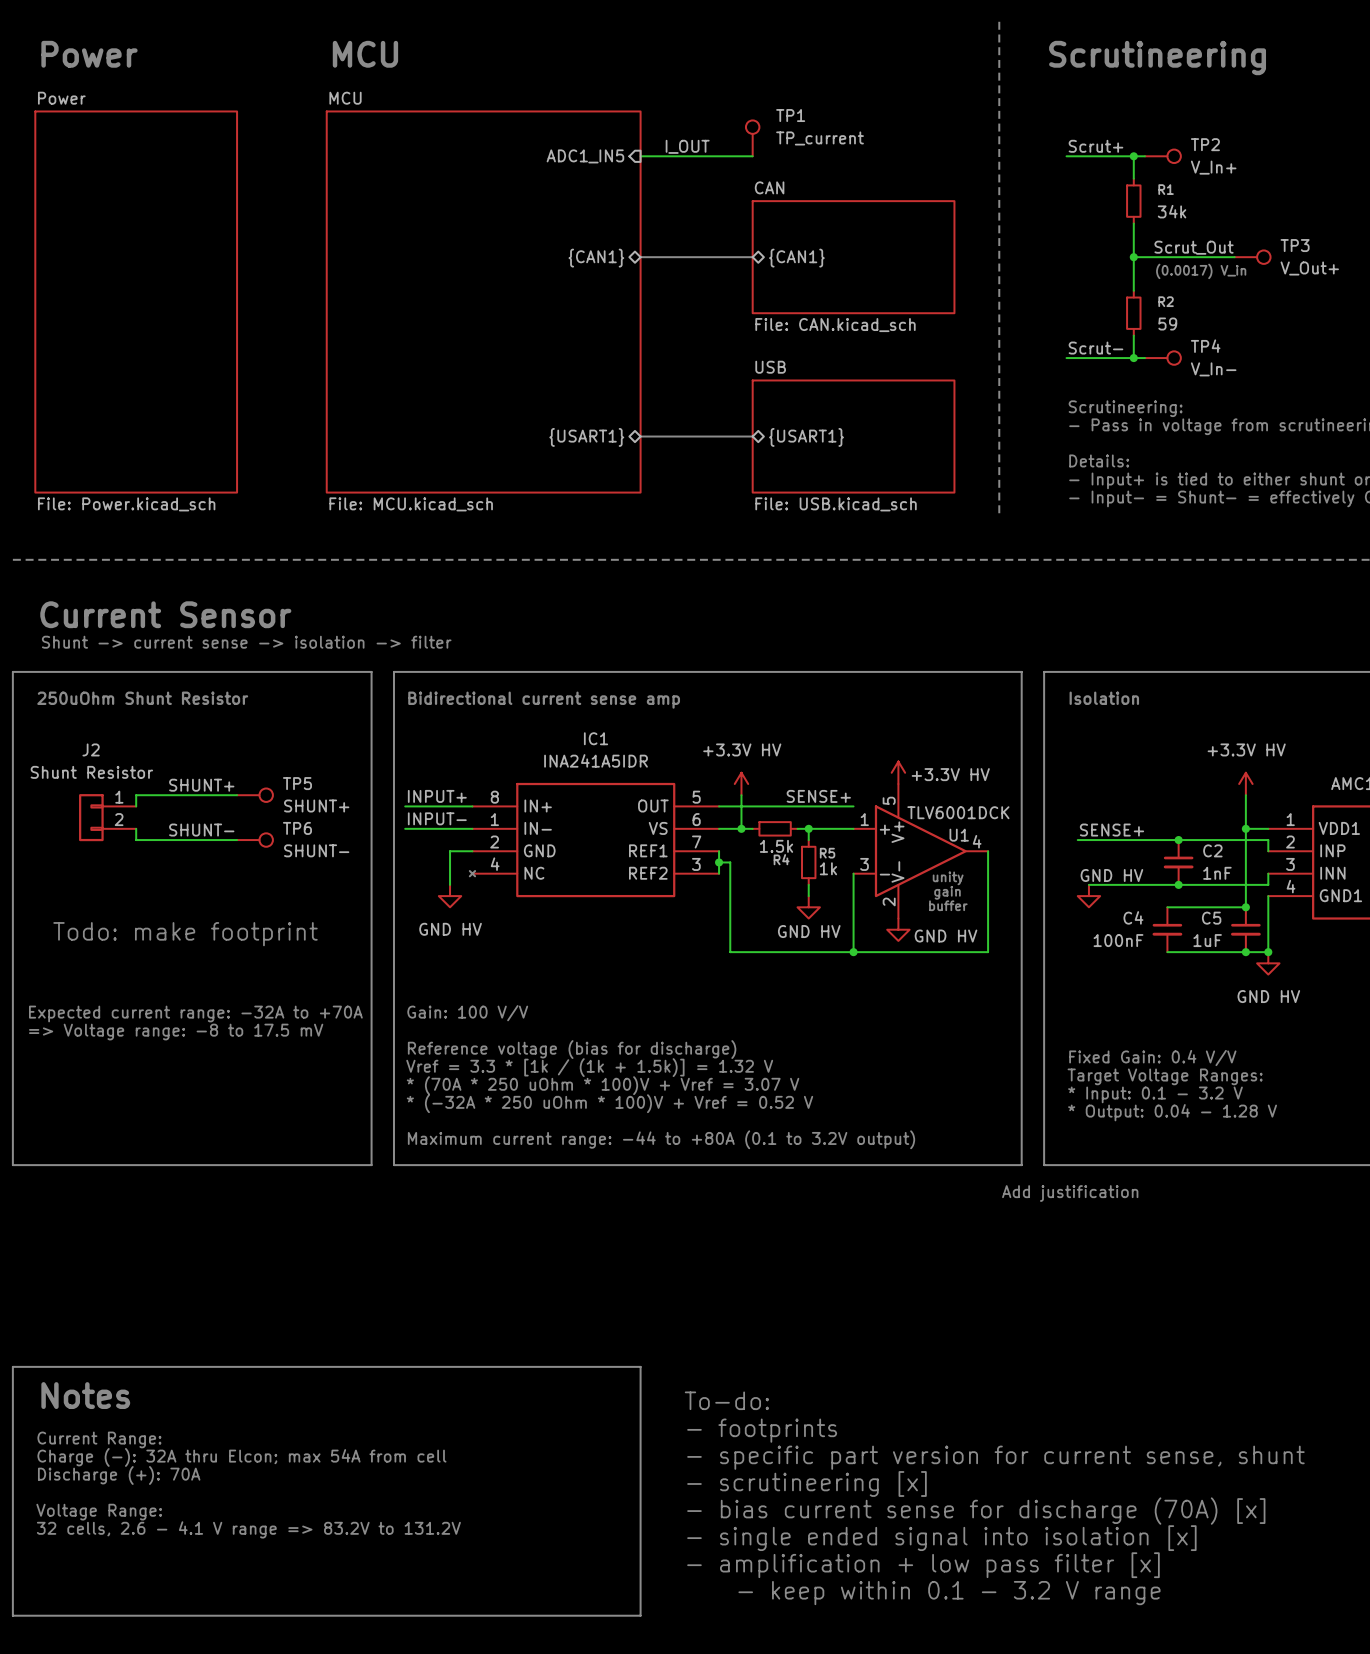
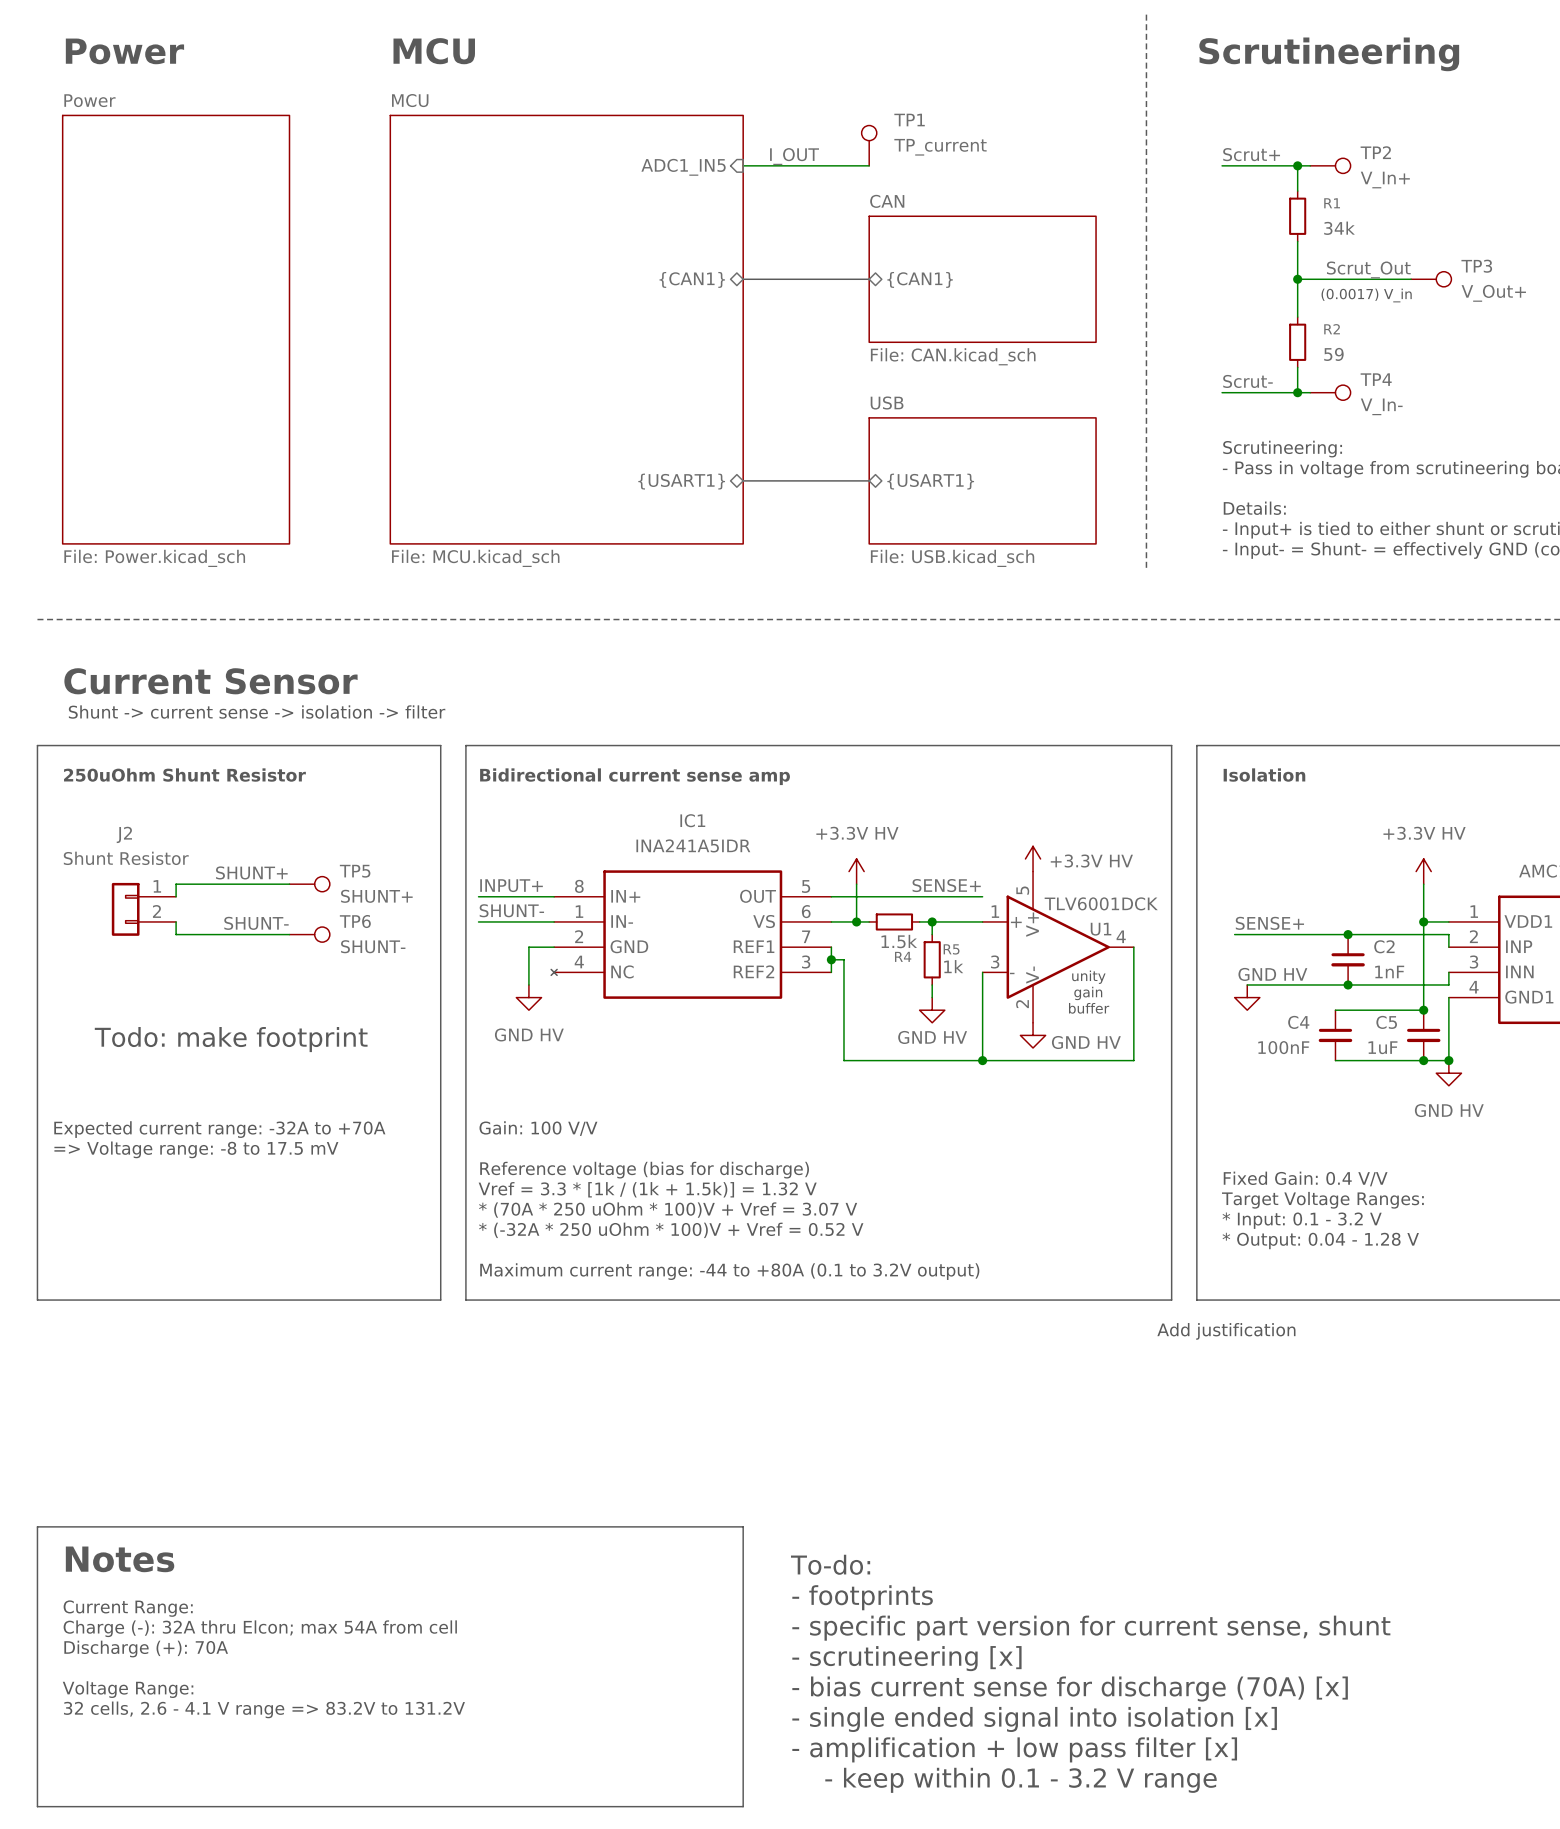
label: INPUT- (437, 818) -> SHUNT- (511, 910)

